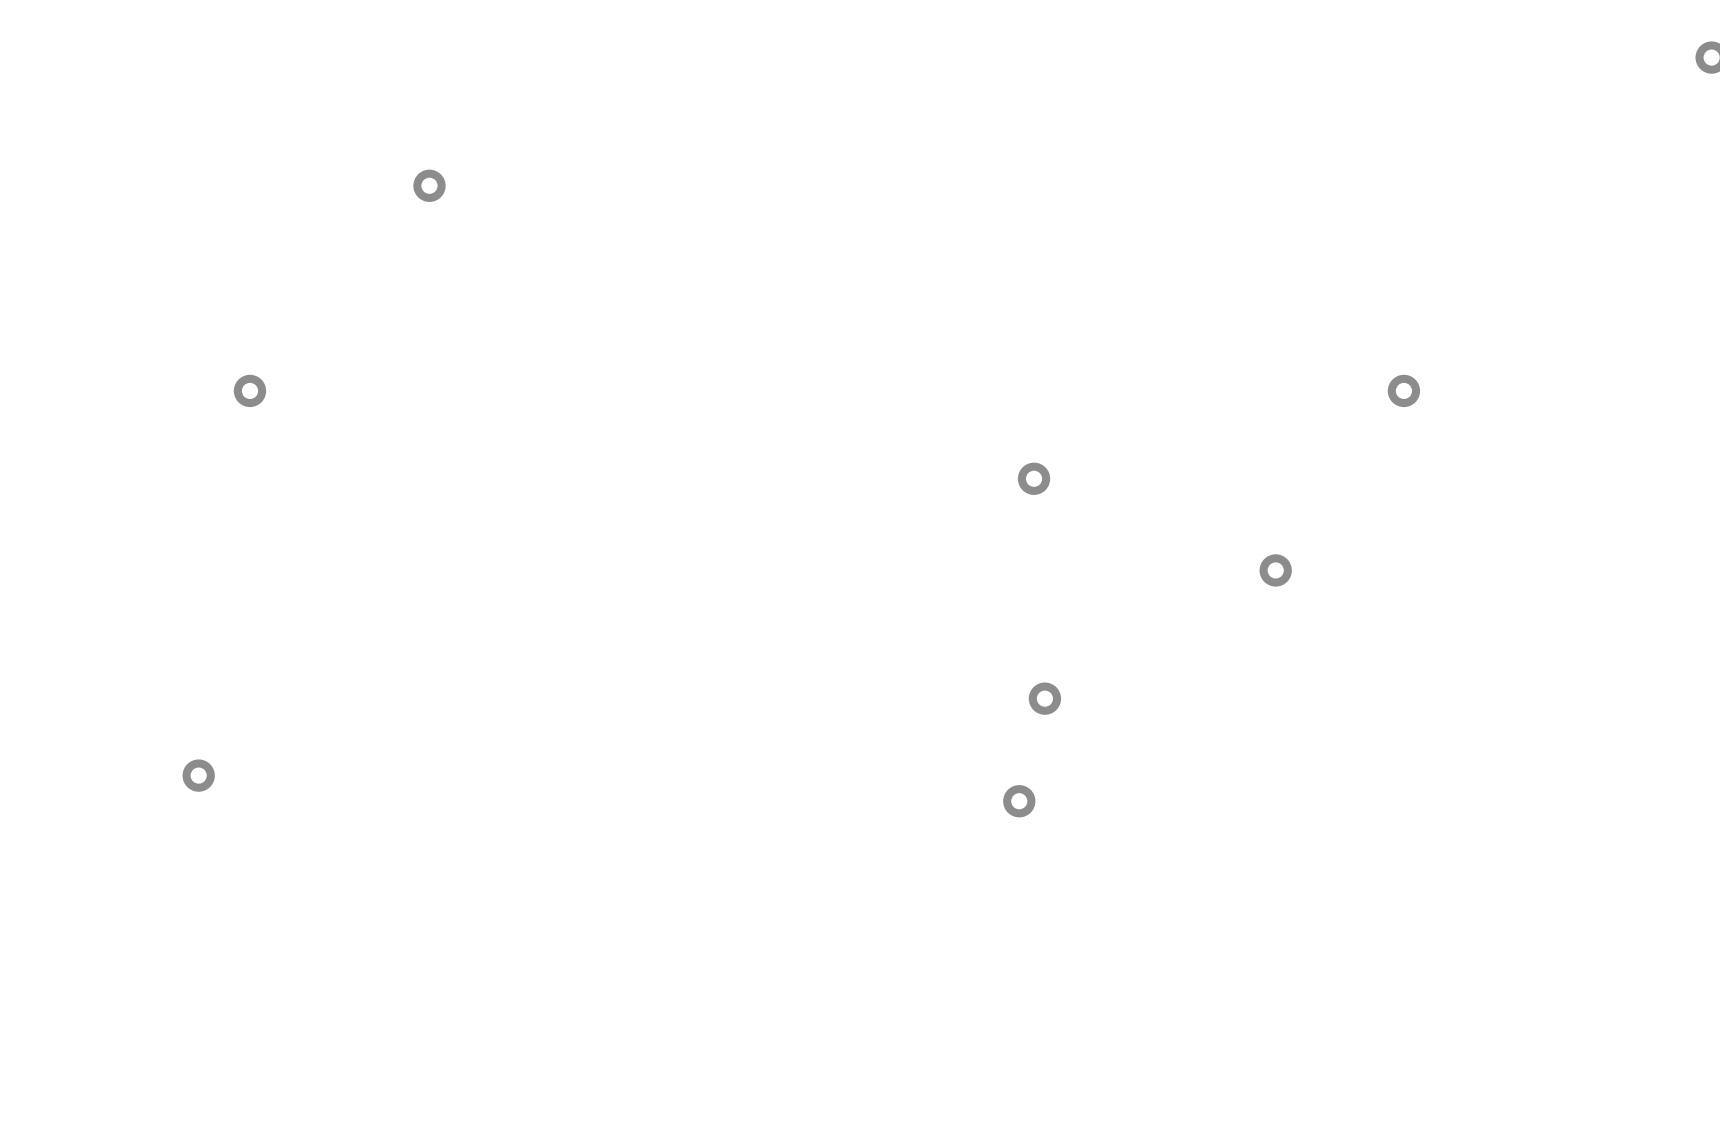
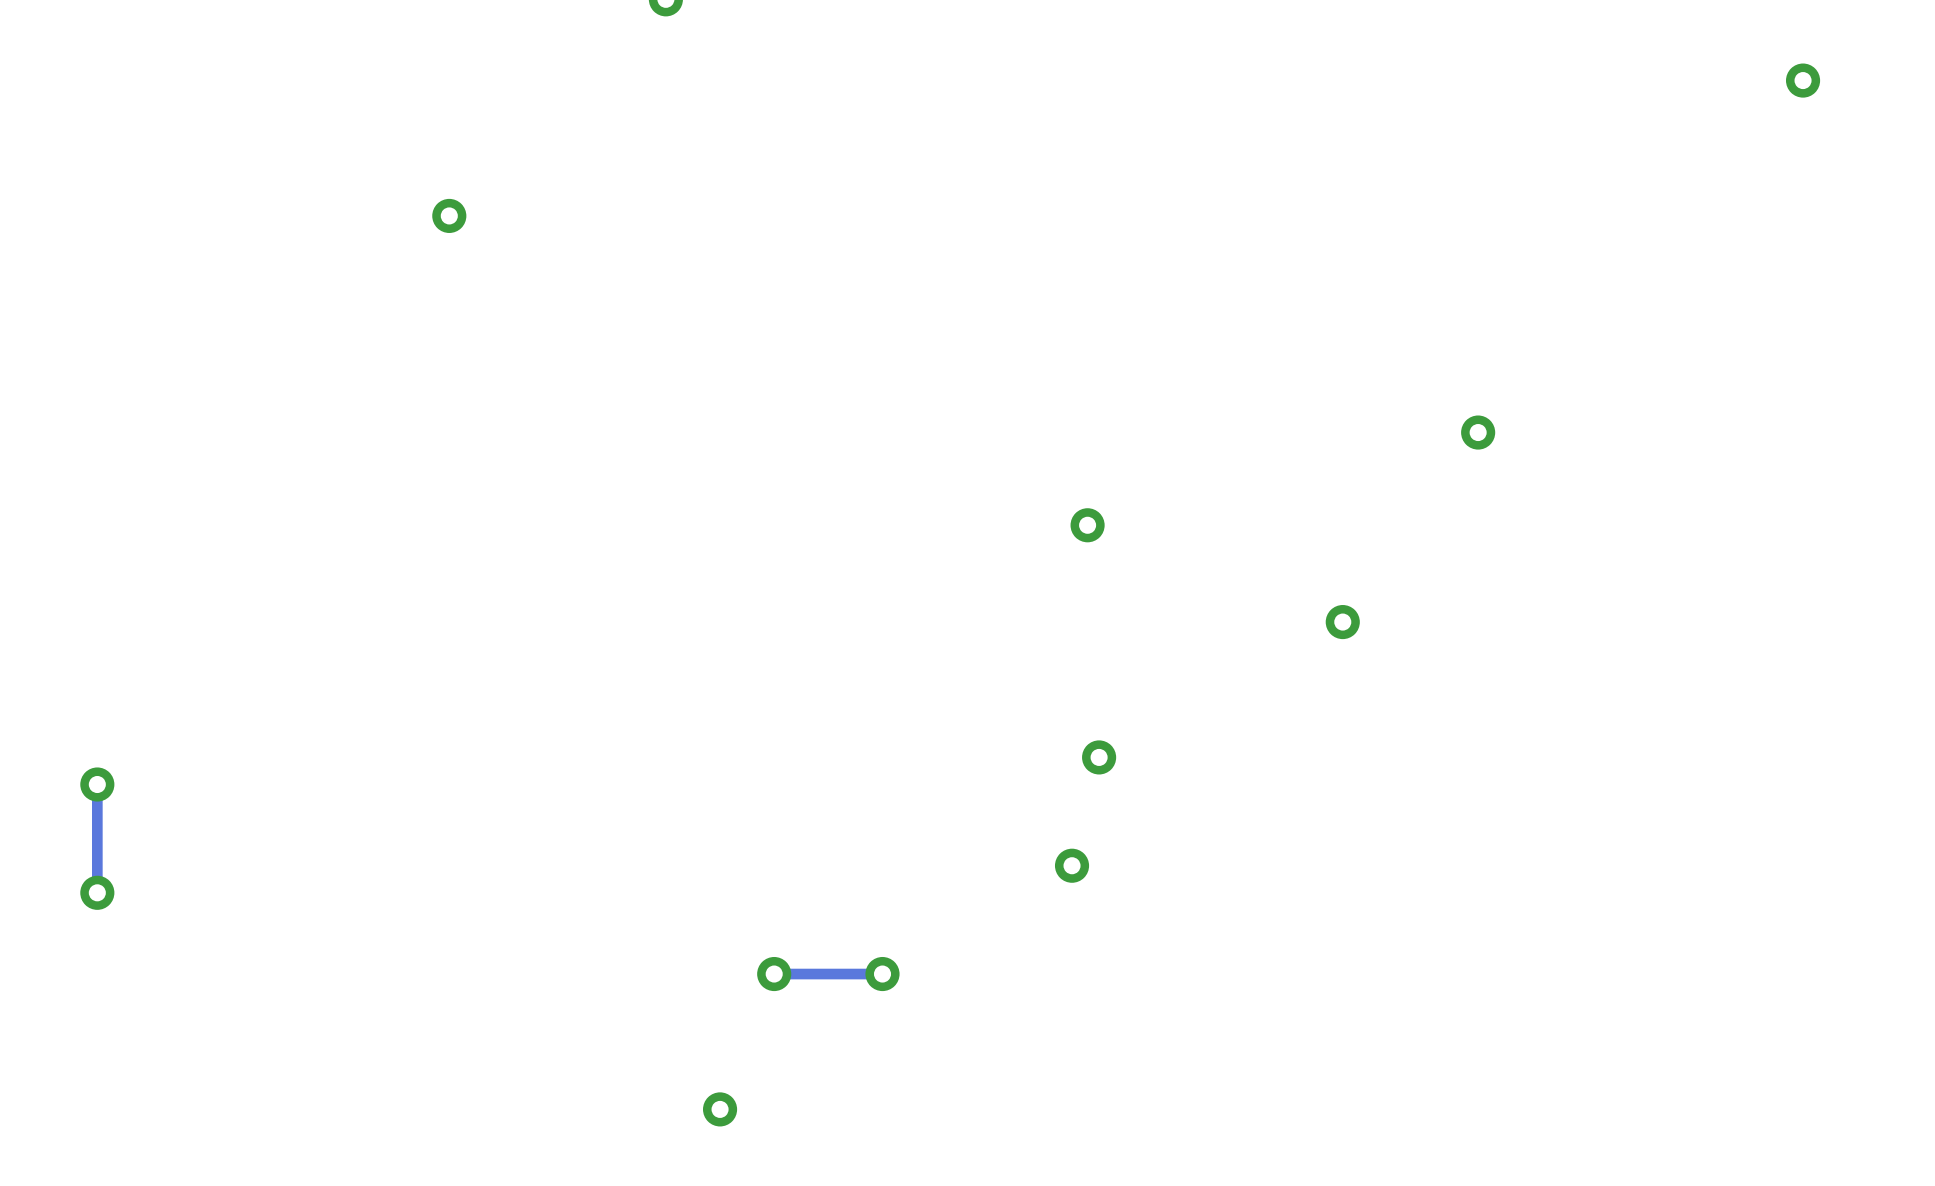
via: (249, 390) -> none
track: none -> (97, 784) (97, 892)
via: none -> (97, 784)
via: (198, 775) -> none
via: none -> (97, 892)
via: none -> (774, 974)
track: none -> (882, 974) (774, 974)
via: none -> (882, 974)
via: none -> (720, 1109)

